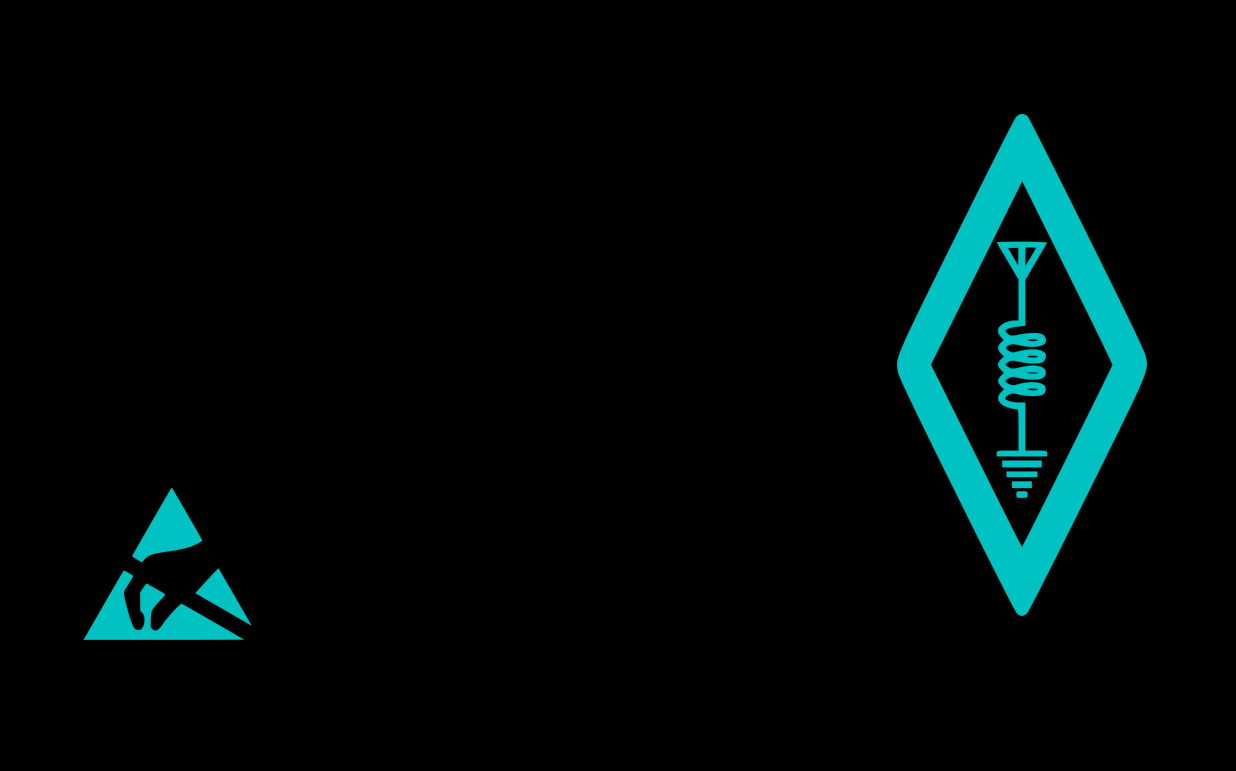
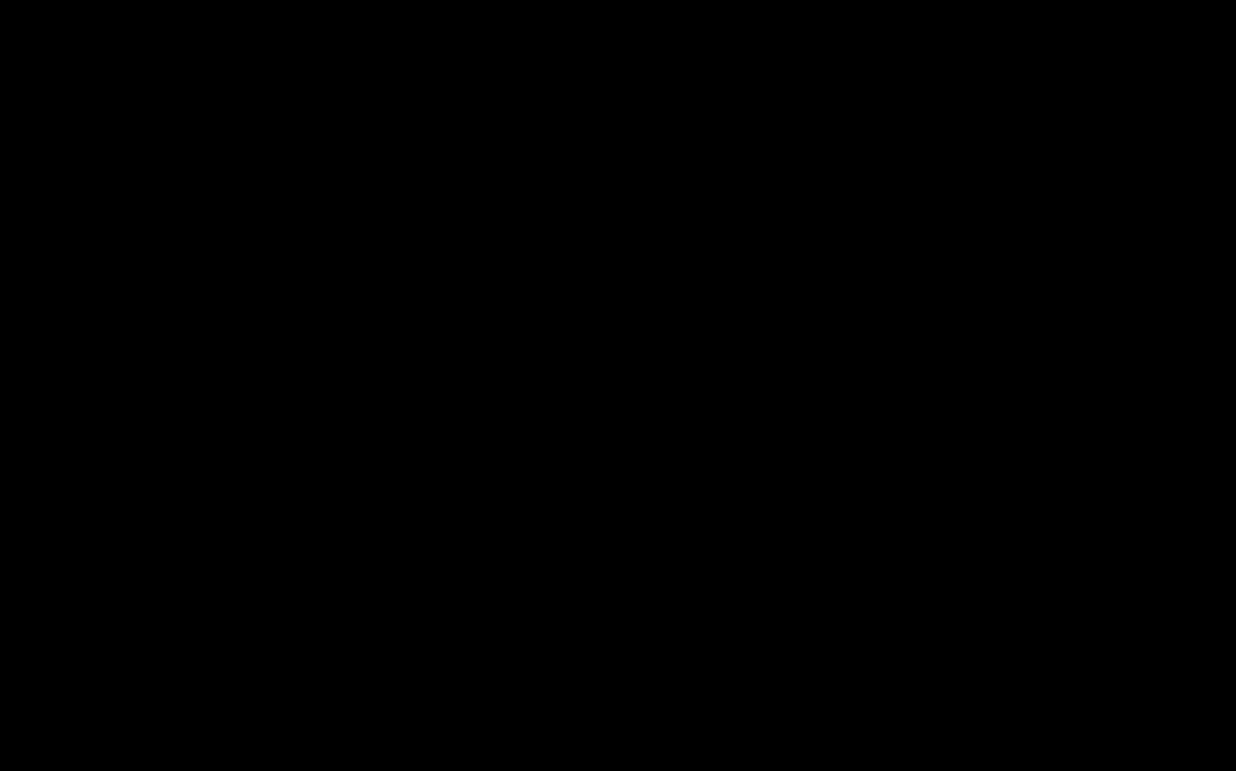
drawing: [896, 113, 1147, 617] -> none
drawing: [83, 487, 252, 640] -> none

